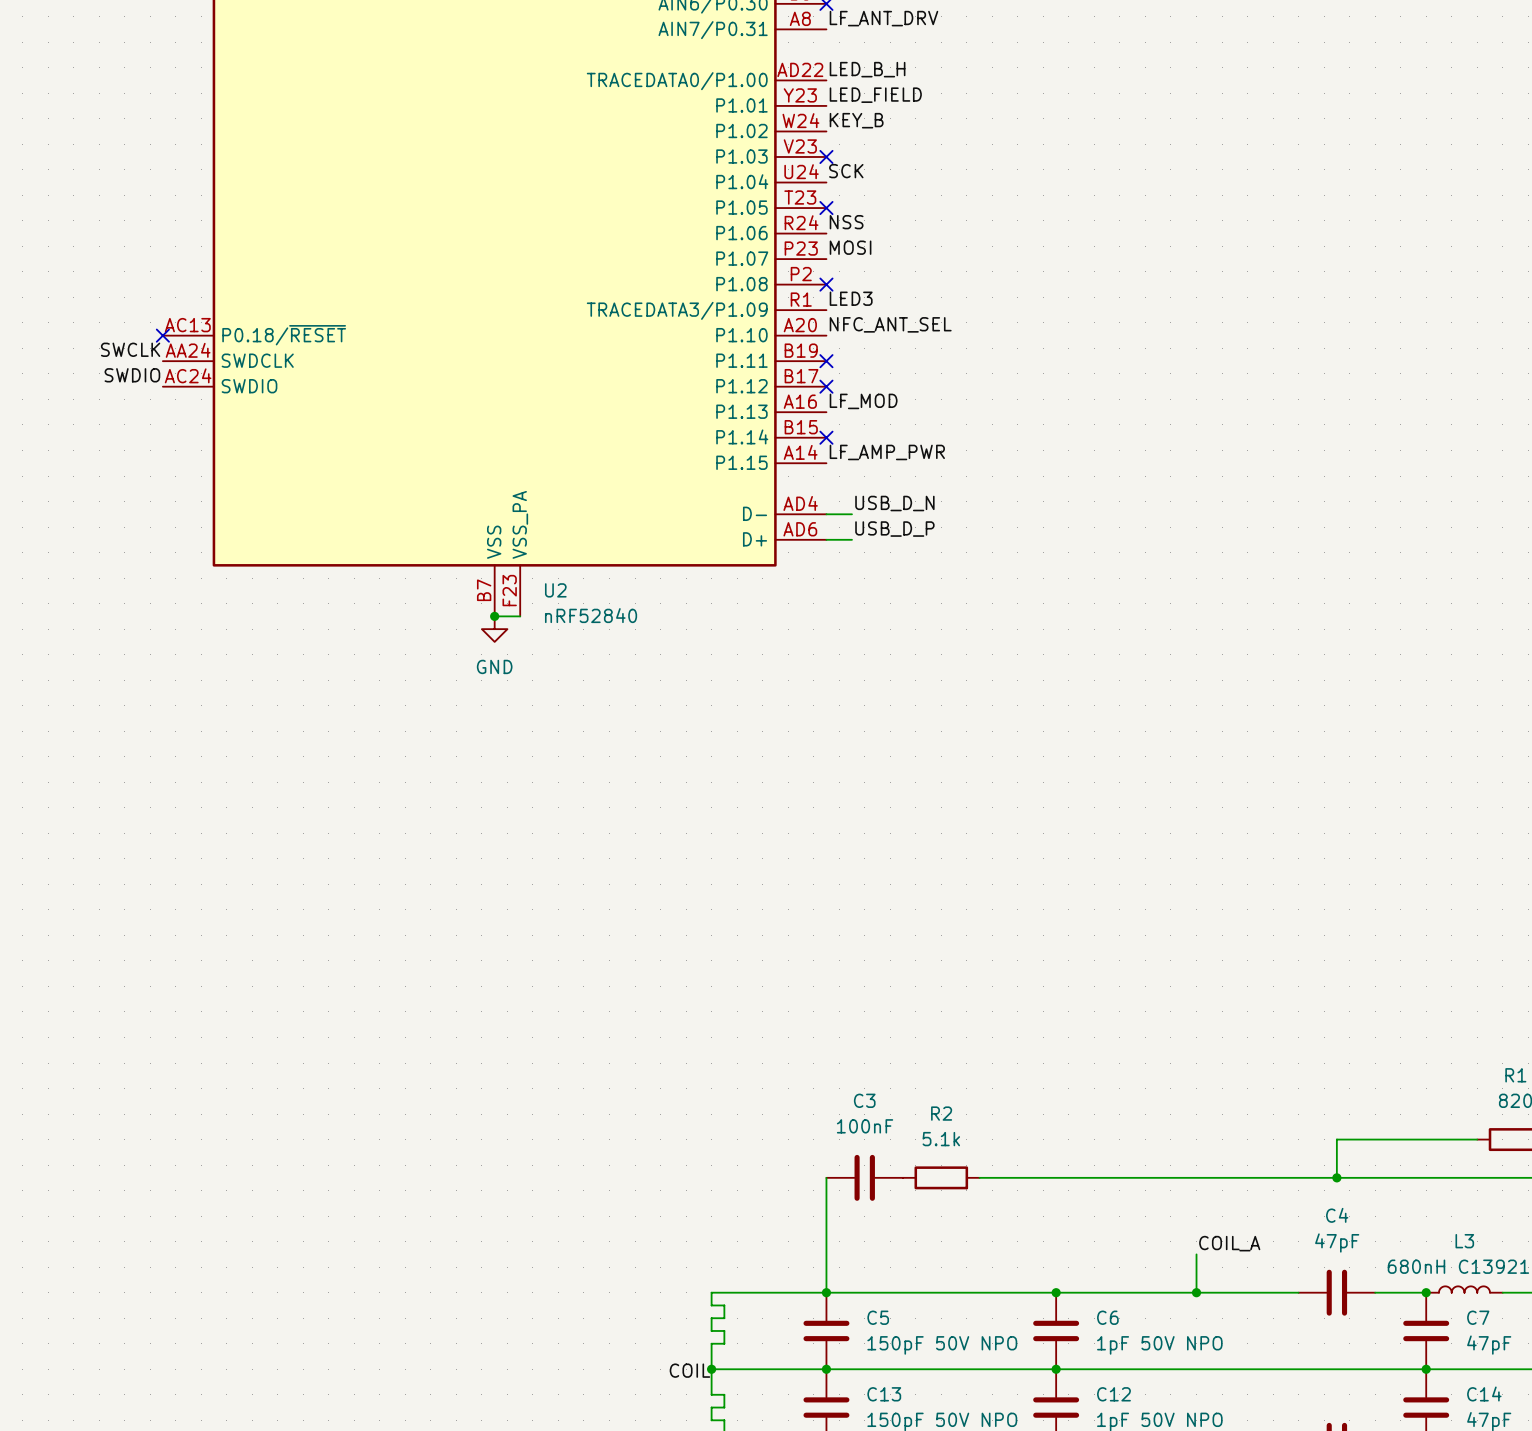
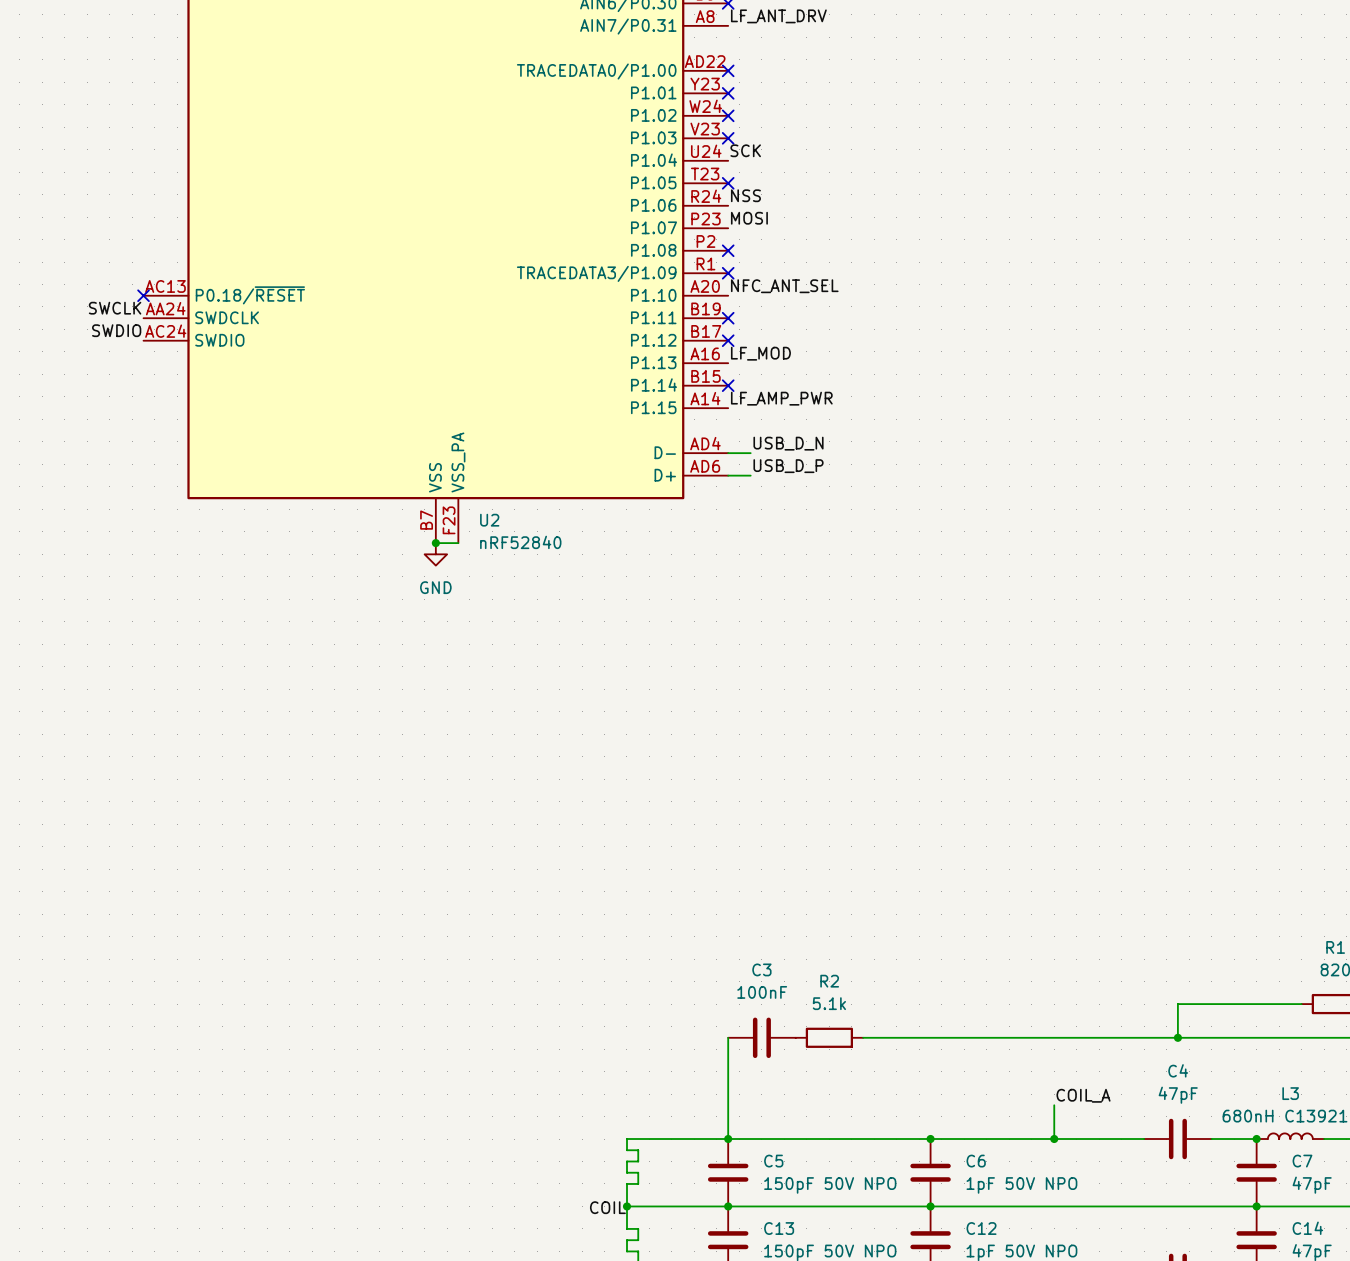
label: LED_B_H (867, 69) -> none
no-connect mark: none -> (728, 70)
label: LED_FIELD (875, 95) -> none
no-connect mark: none -> (728, 93)
label: KEY_B (856, 120) -> none
no-connect mark: none -> (728, 115)
label: LED3 (851, 298) -> none
no-connect mark: none -> (728, 273)

